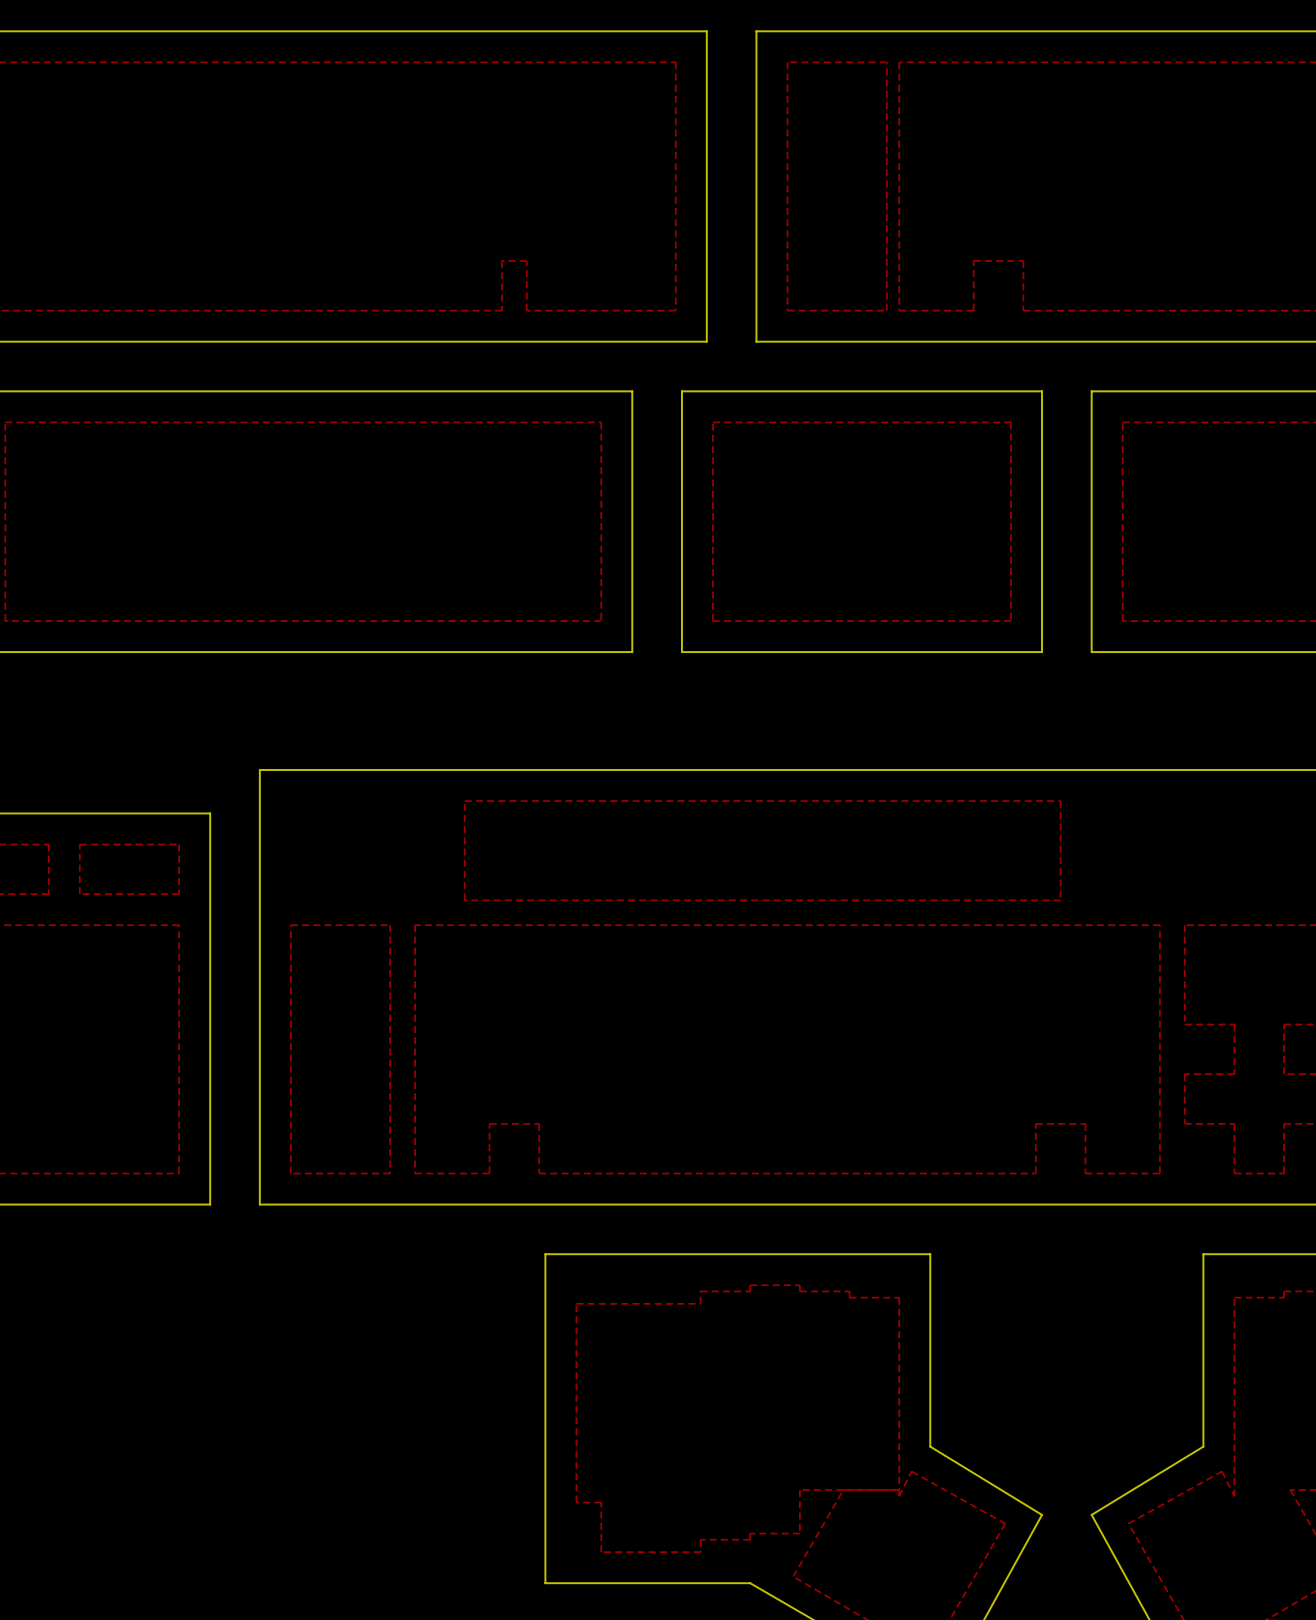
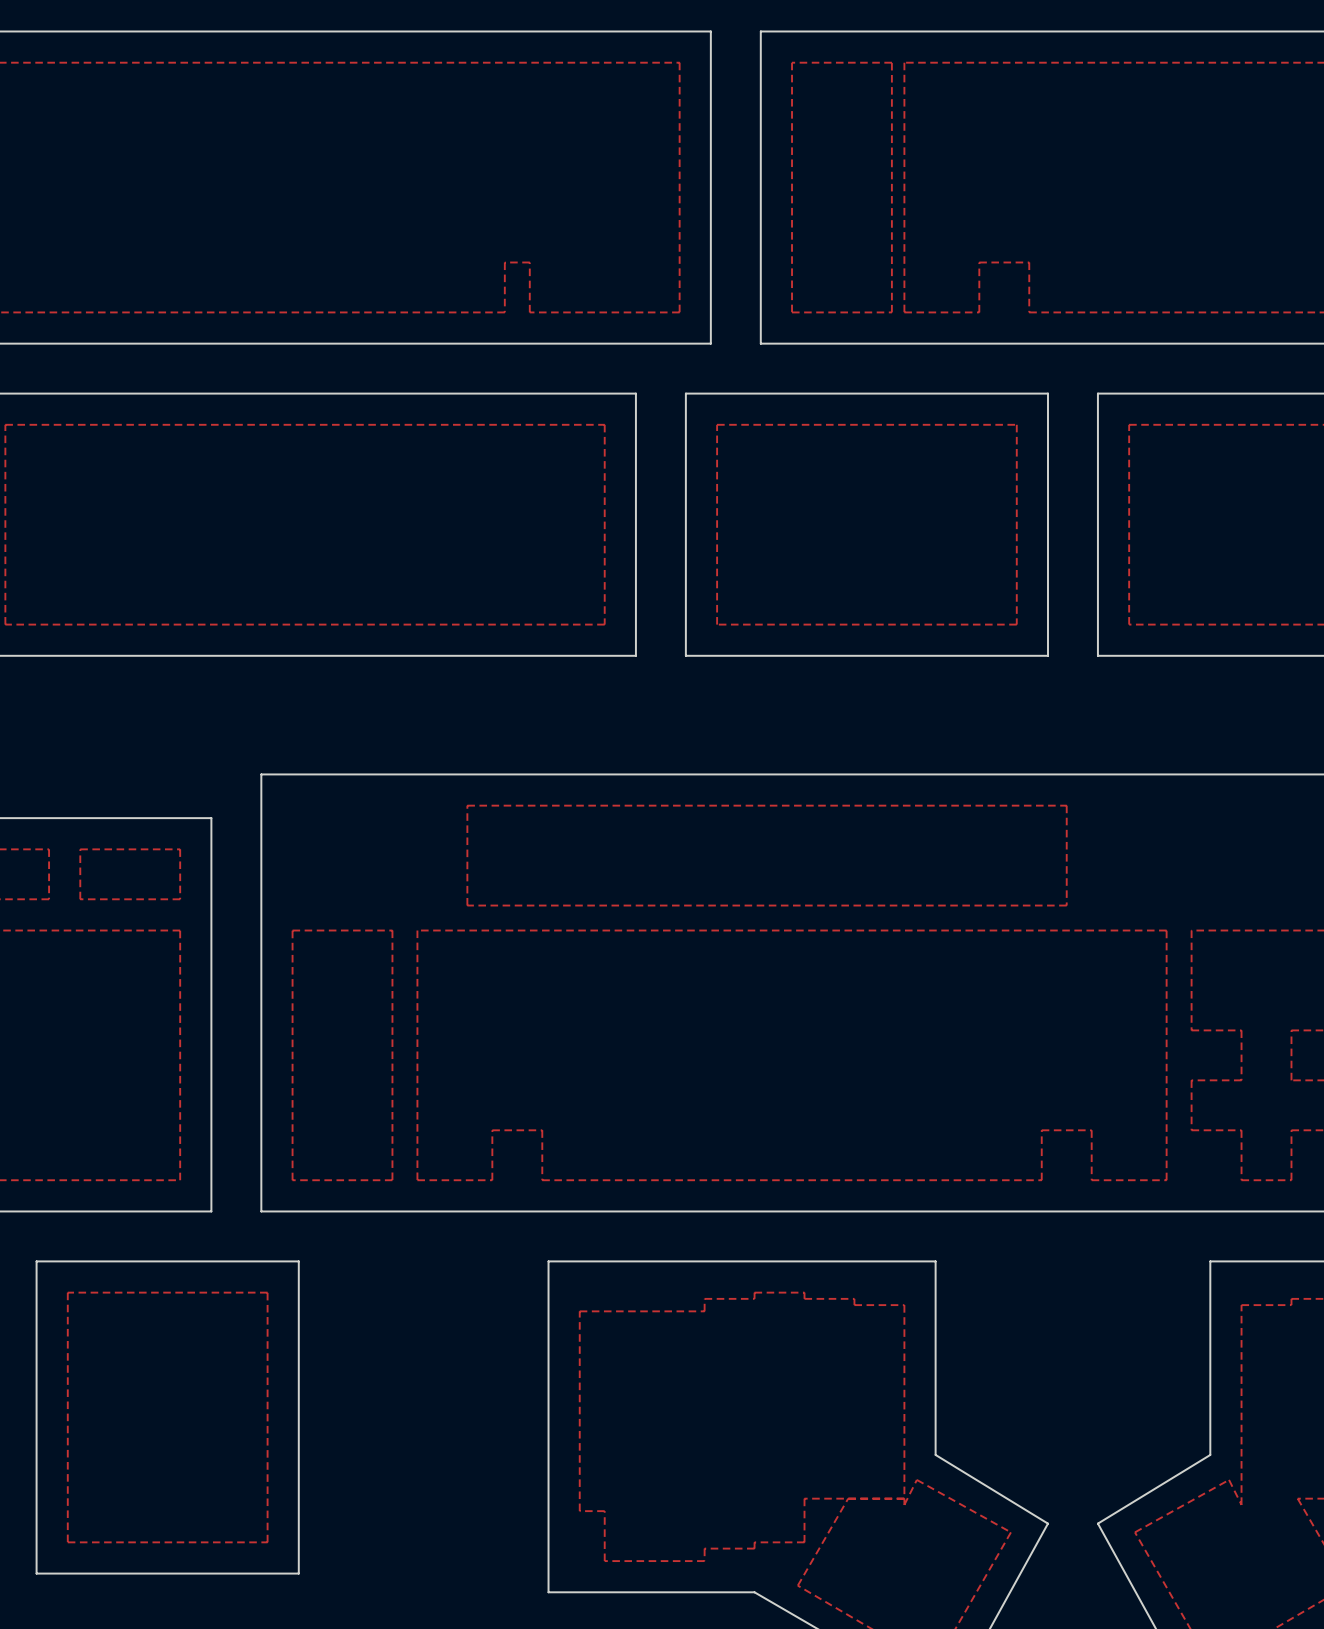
board edge: none -> (36, 1261) (36, 1573) (298, 1573) (298, 1261) (36, 1261)
top zone outline: none -> (67, 1292) (267, 1292) (267, 1542) (67, 1542) (67, 1292)

